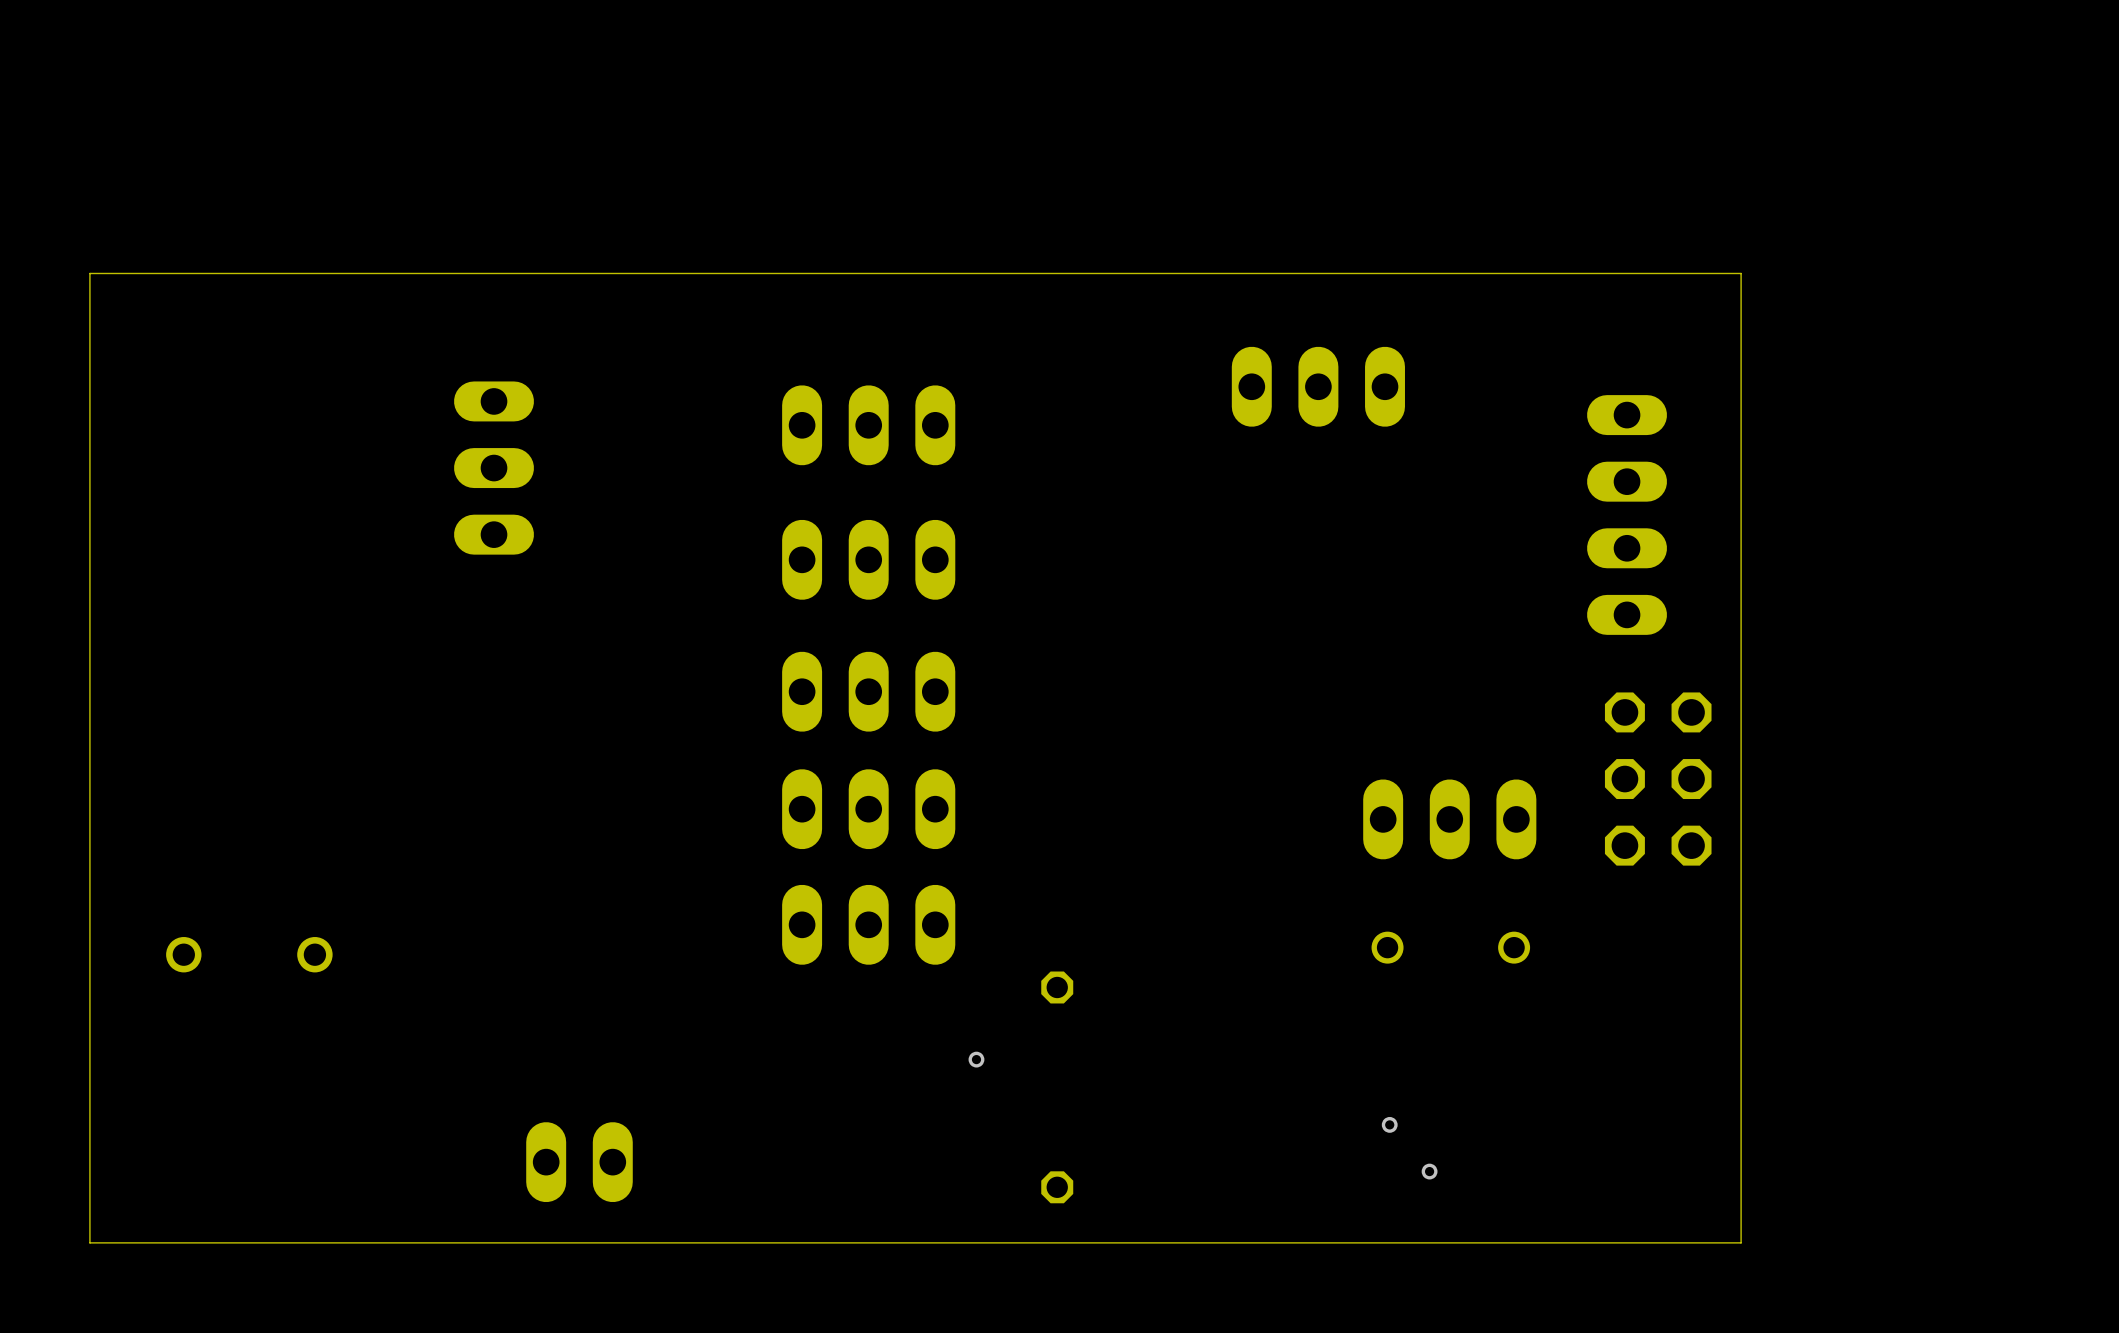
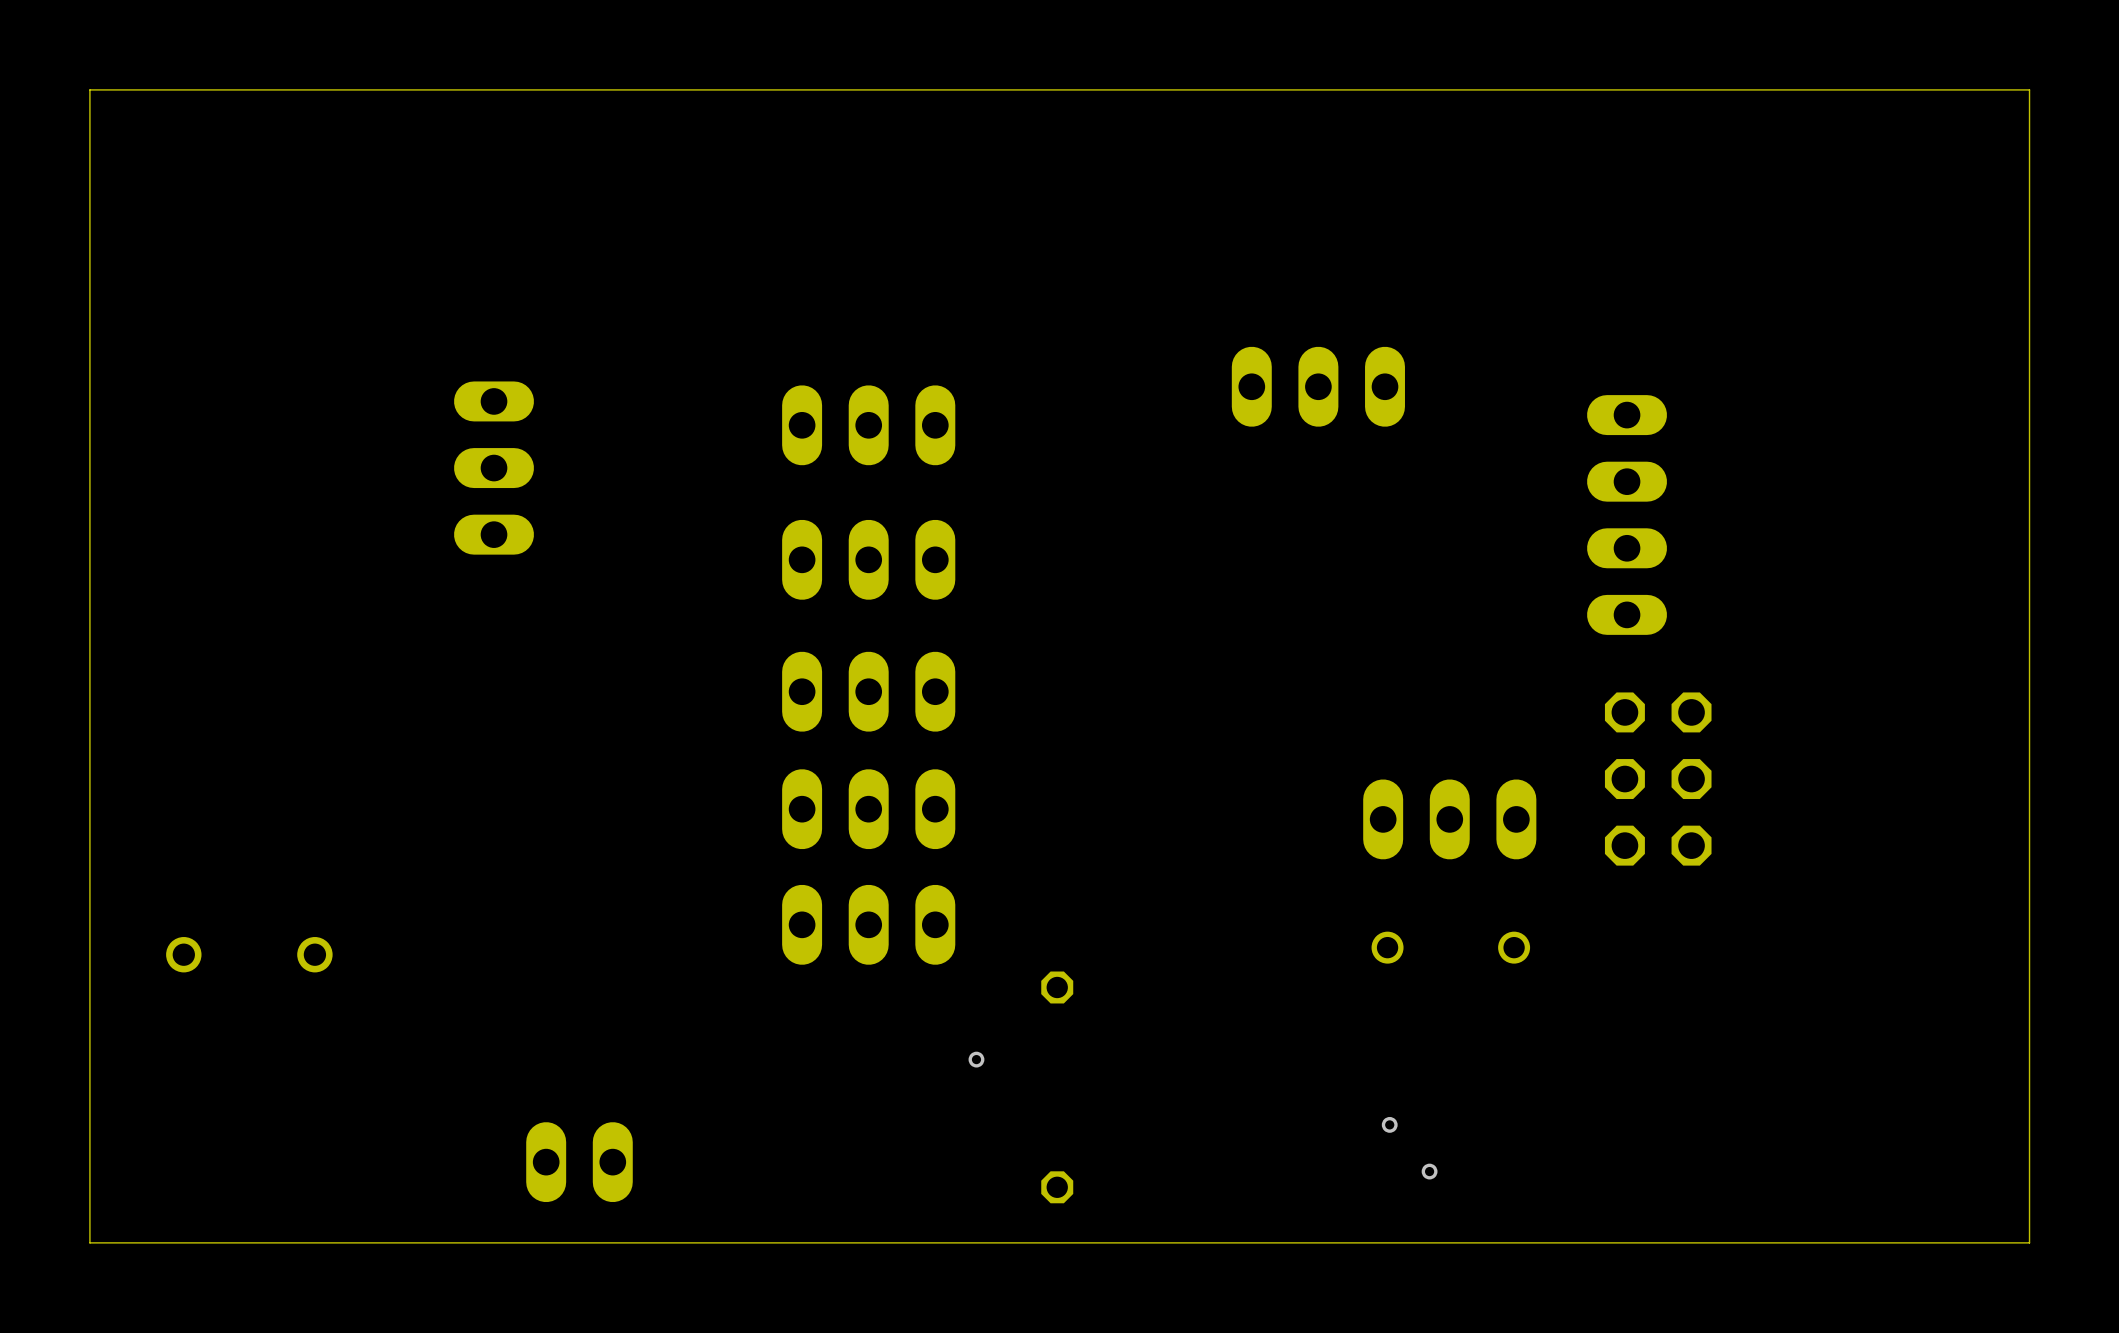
board edge: (89, 273) (1741, 273) (1741, 1242) -> (89, 273) (89, 89) (2029, 89) (2029, 1242) (1741, 1242)

